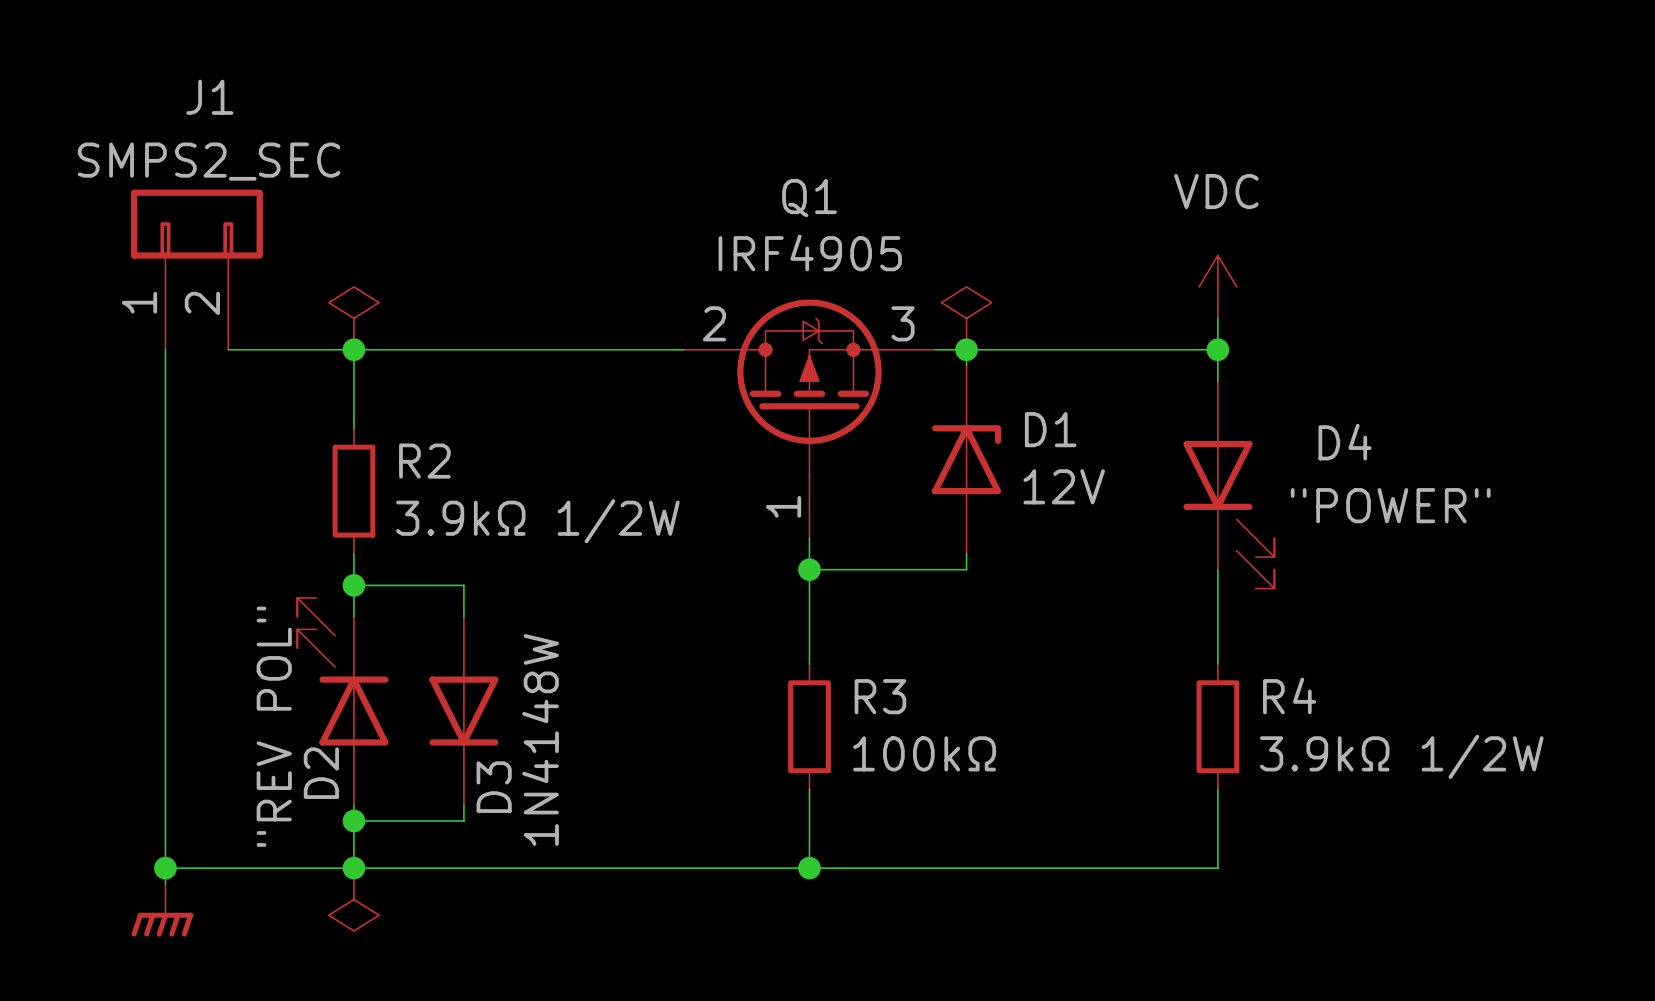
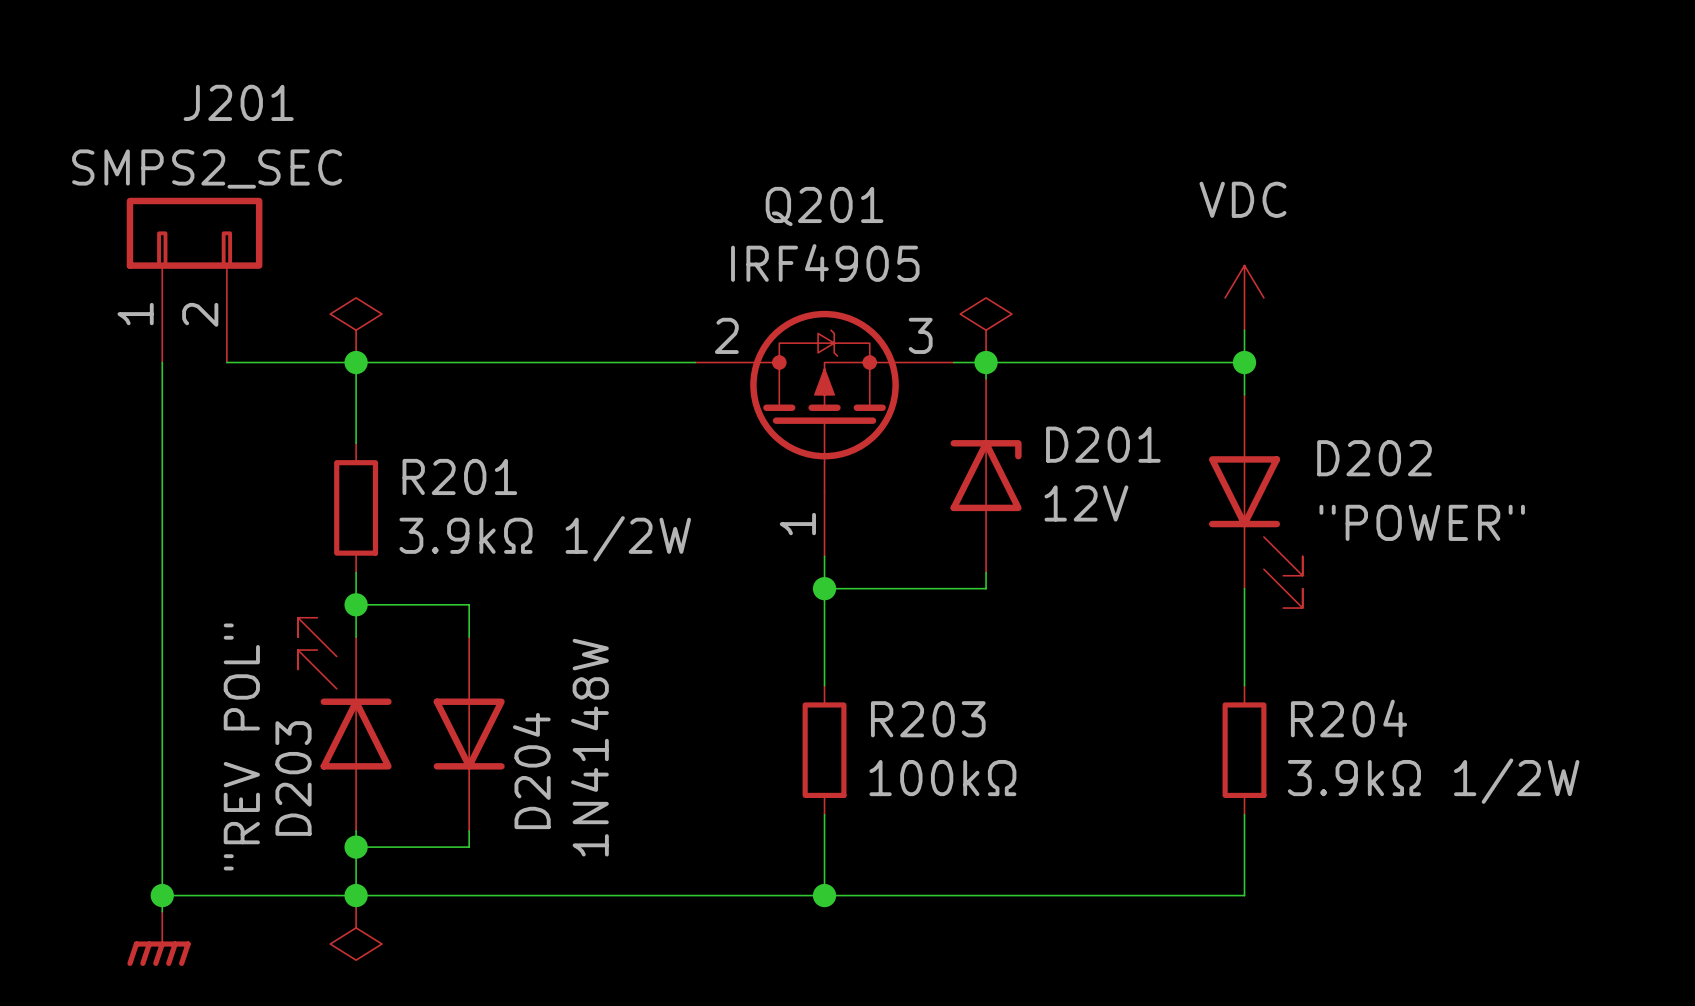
J1 name: J1 (209, 97) -> J201 (238, 102)
Q1 name: Q1 (809, 198) -> Q201 (824, 206)
D1 name: D1 (1050, 429) -> D201 (1103, 444)
D4 name: D4 (1345, 442) -> D202 (1374, 458)
R2 name: R2 (424, 461) -> R201 (459, 476)
R4 name: R4 (1289, 695) -> R204 (1349, 718)
R3 name: R3 (880, 696) -> R203 (928, 719)
D2 value position: "REV POL" (274, 726) -> "REV POL" (241, 746)
D3 value position: 1N4148W (540, 739) -> 1N4148W (589, 747)
D2 name: D2 (321, 773) -> D203 (293, 778)
D3 name: D3 (494, 787) -> D204 (531, 771)

